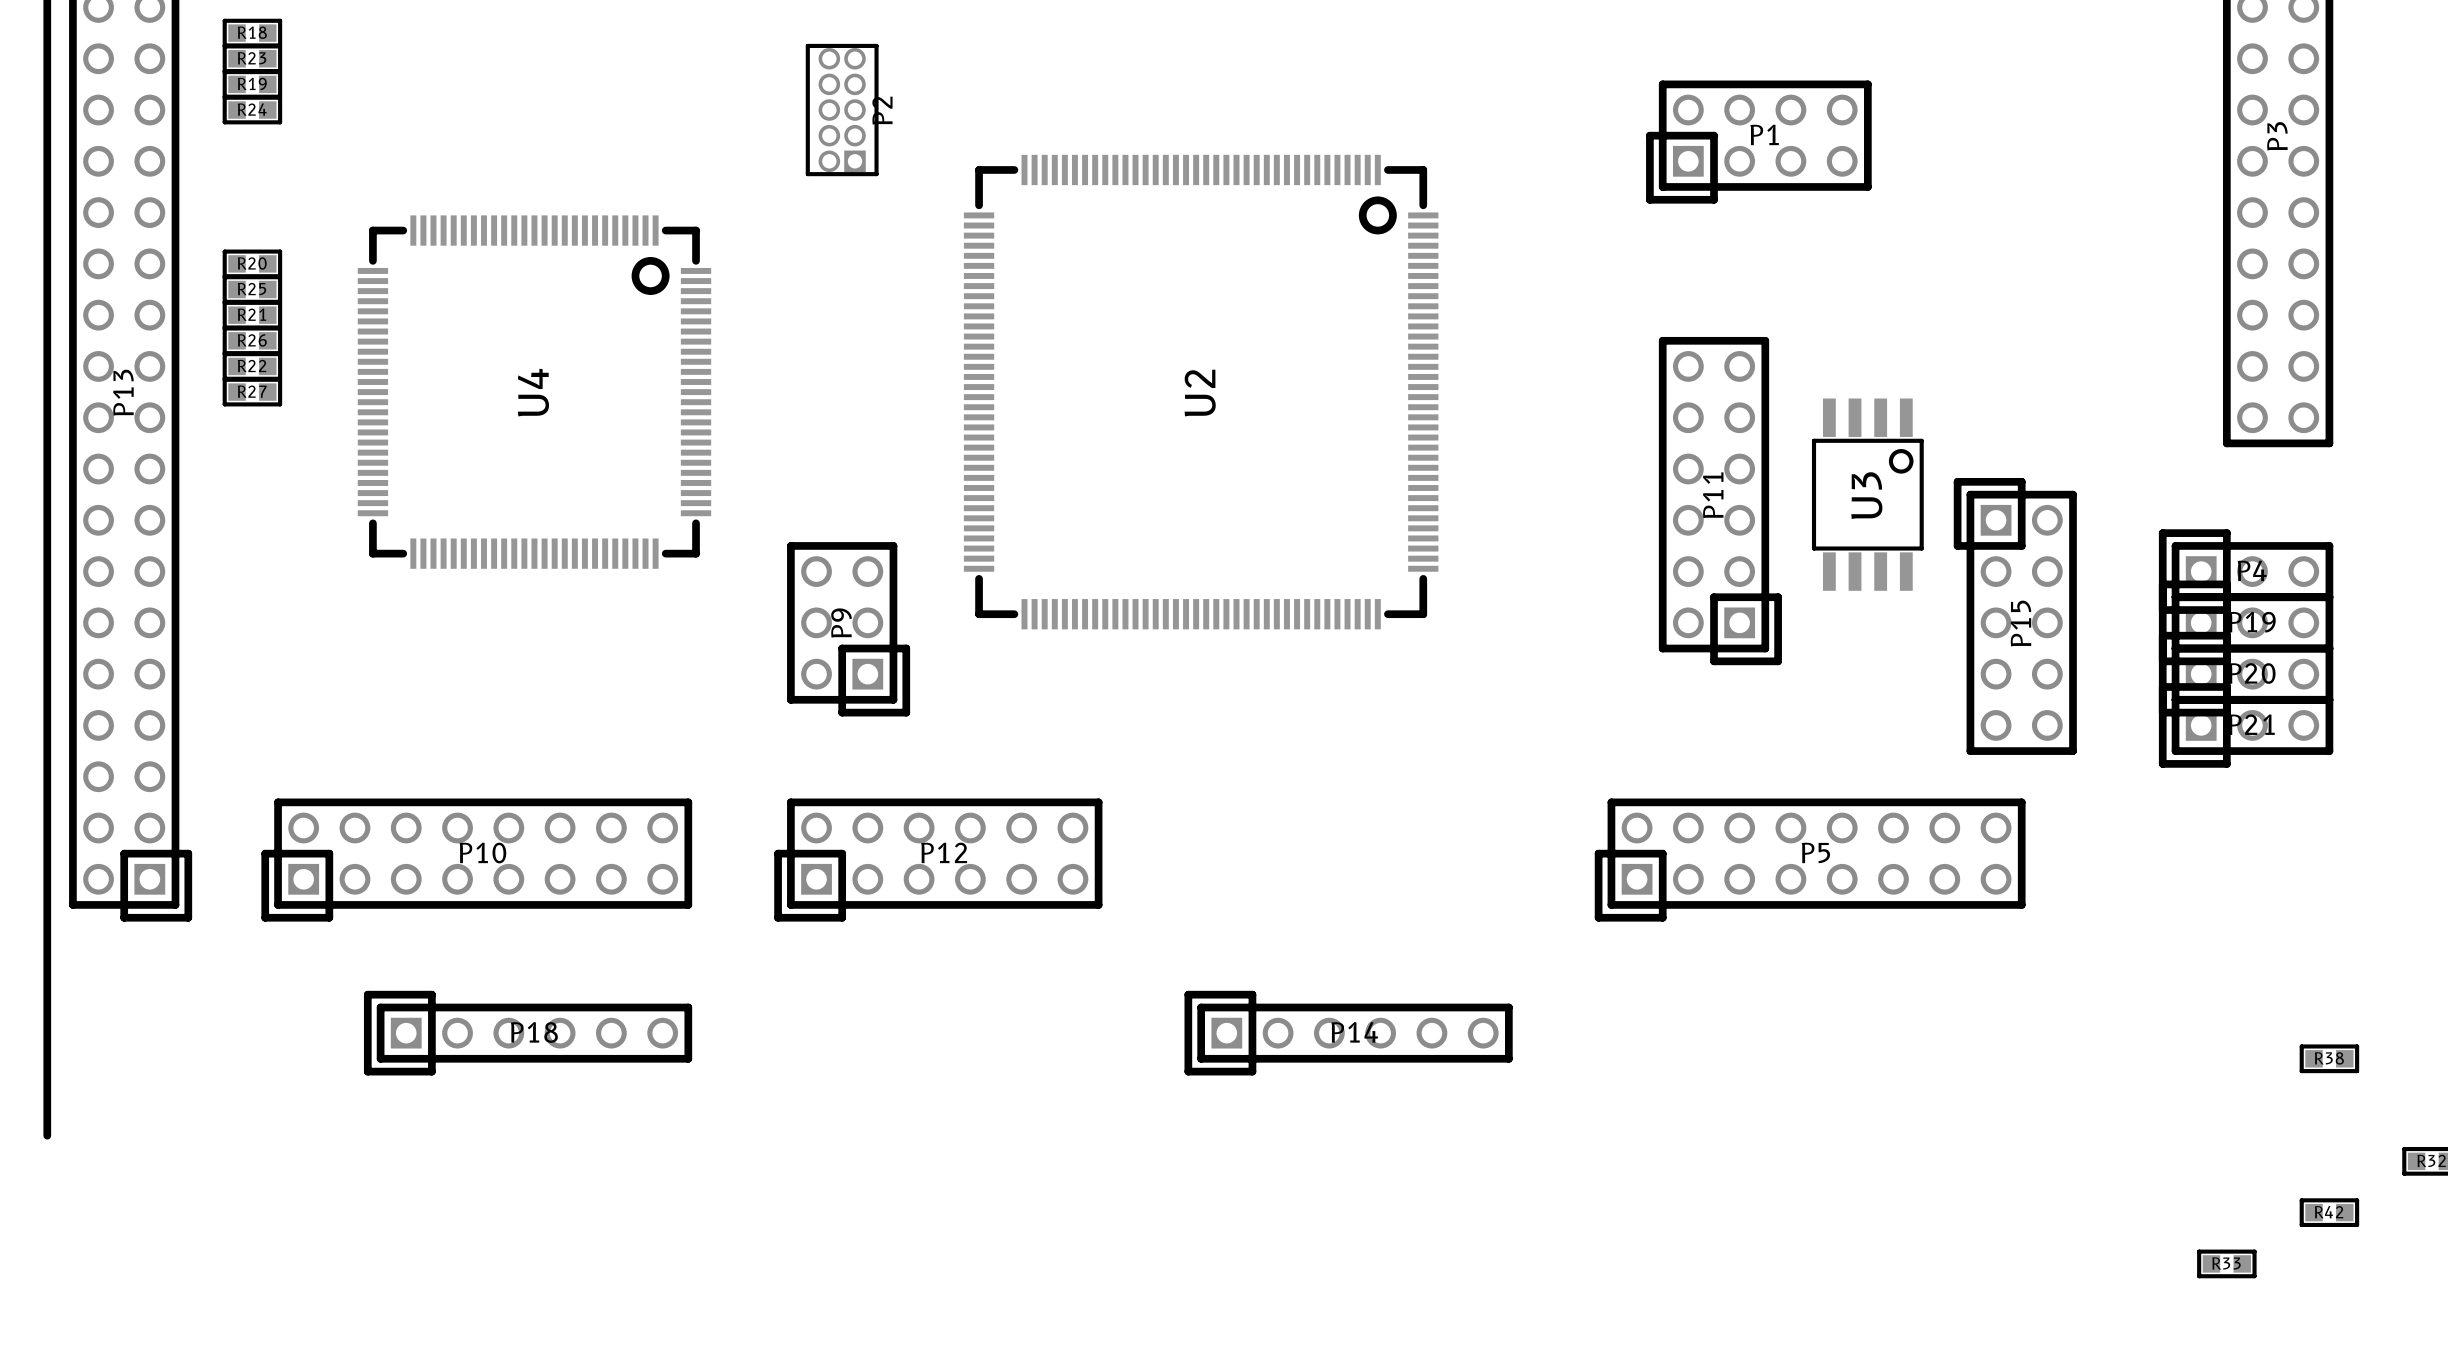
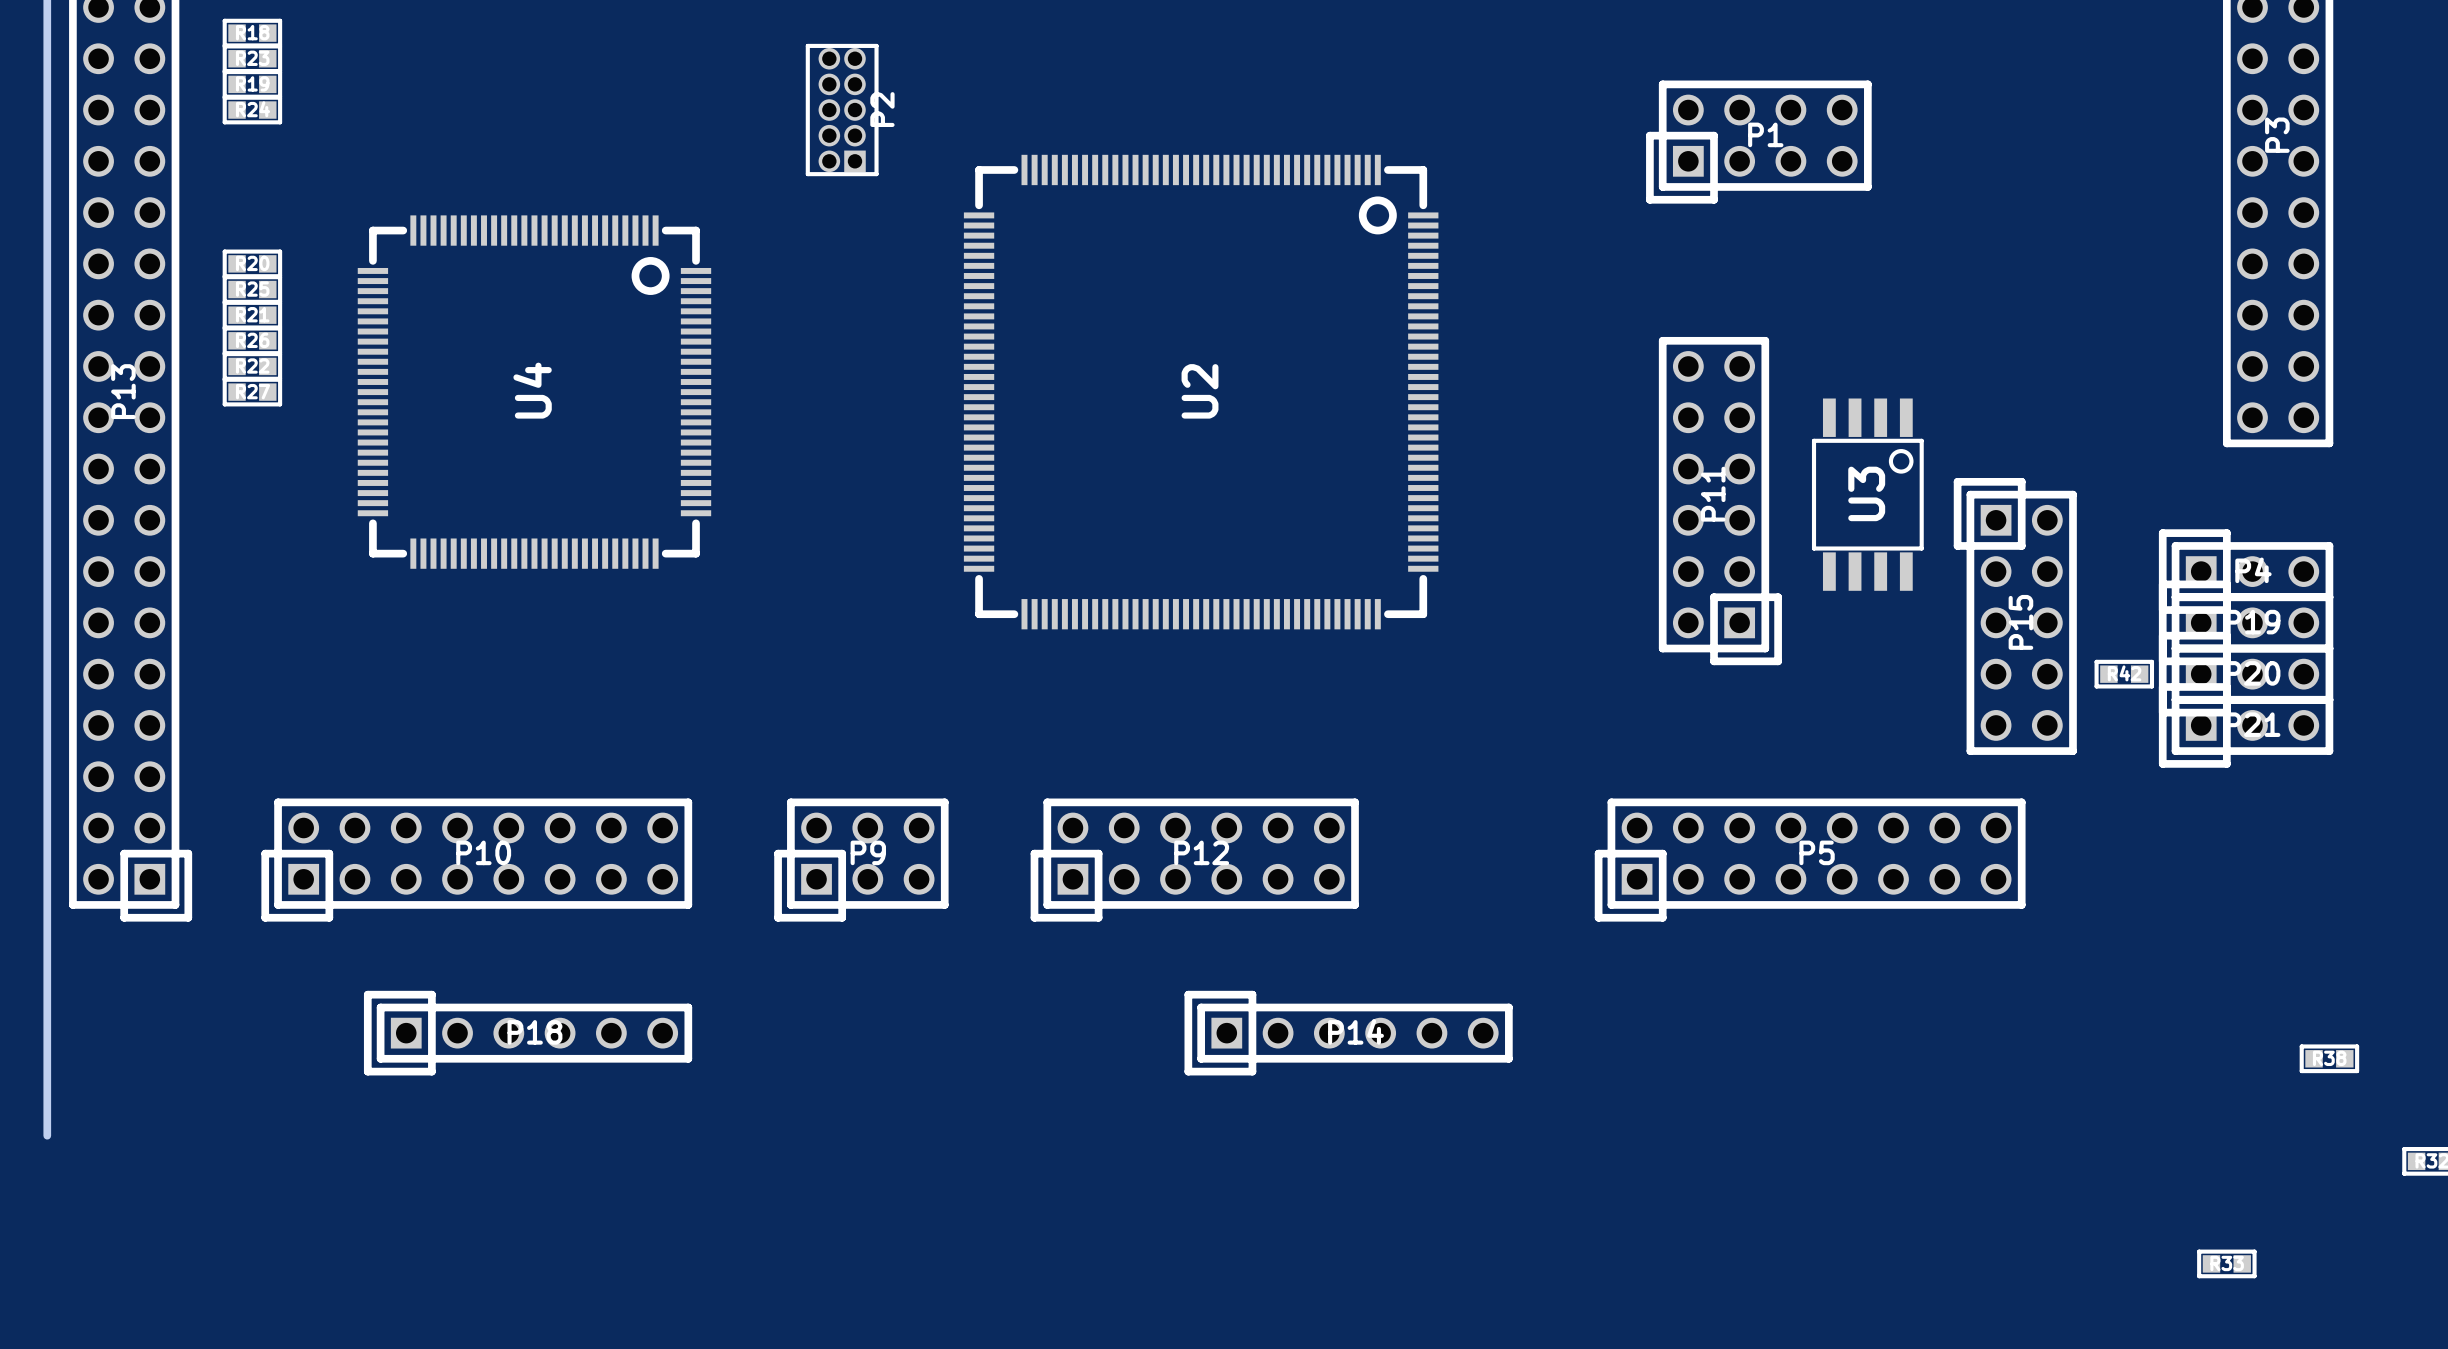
P9 rotation: 0° (848, 629) -> 90° clockwise (861, 860)
P9 position: (848, 629) -> (861, 860)
P12 position: (938, 860) -> (1194, 860)
R42 position: (2329, 1212) -> (2124, 674)

